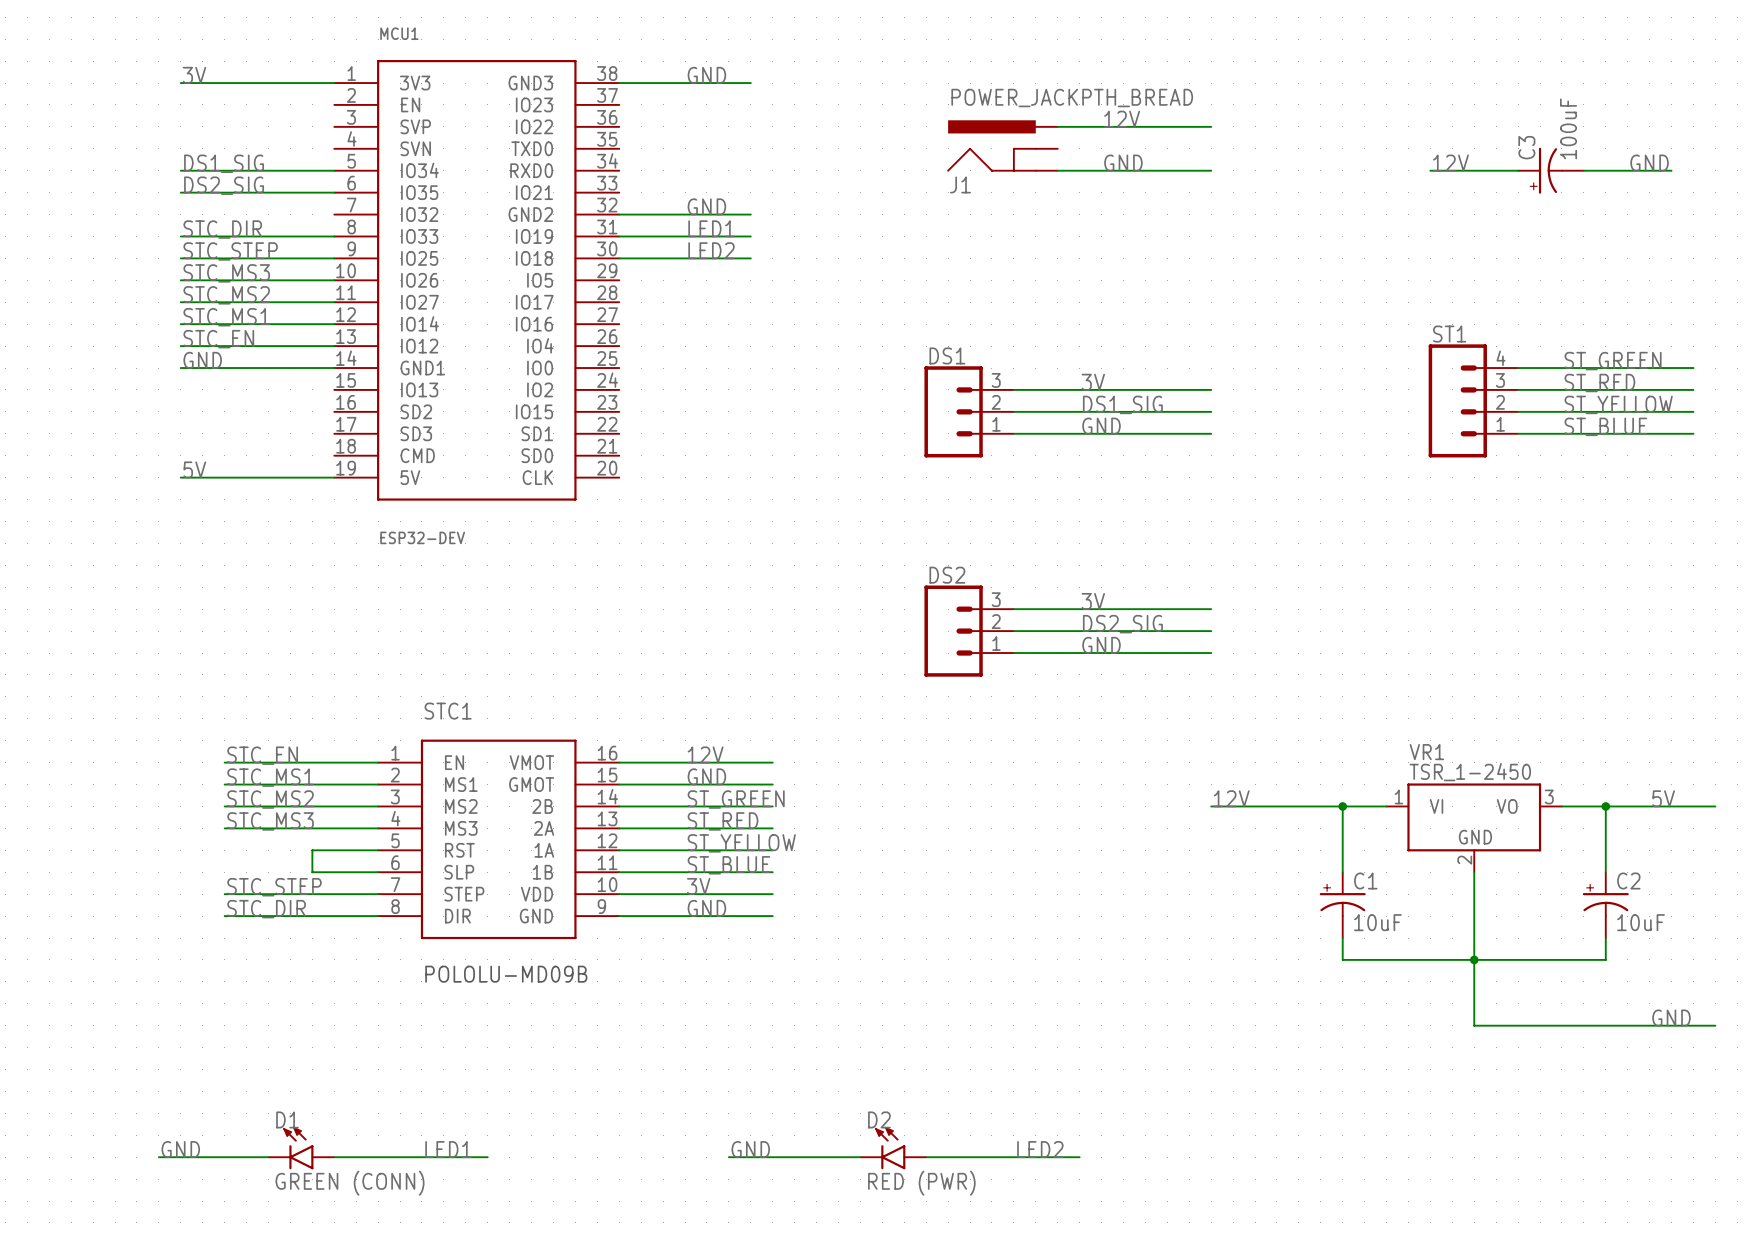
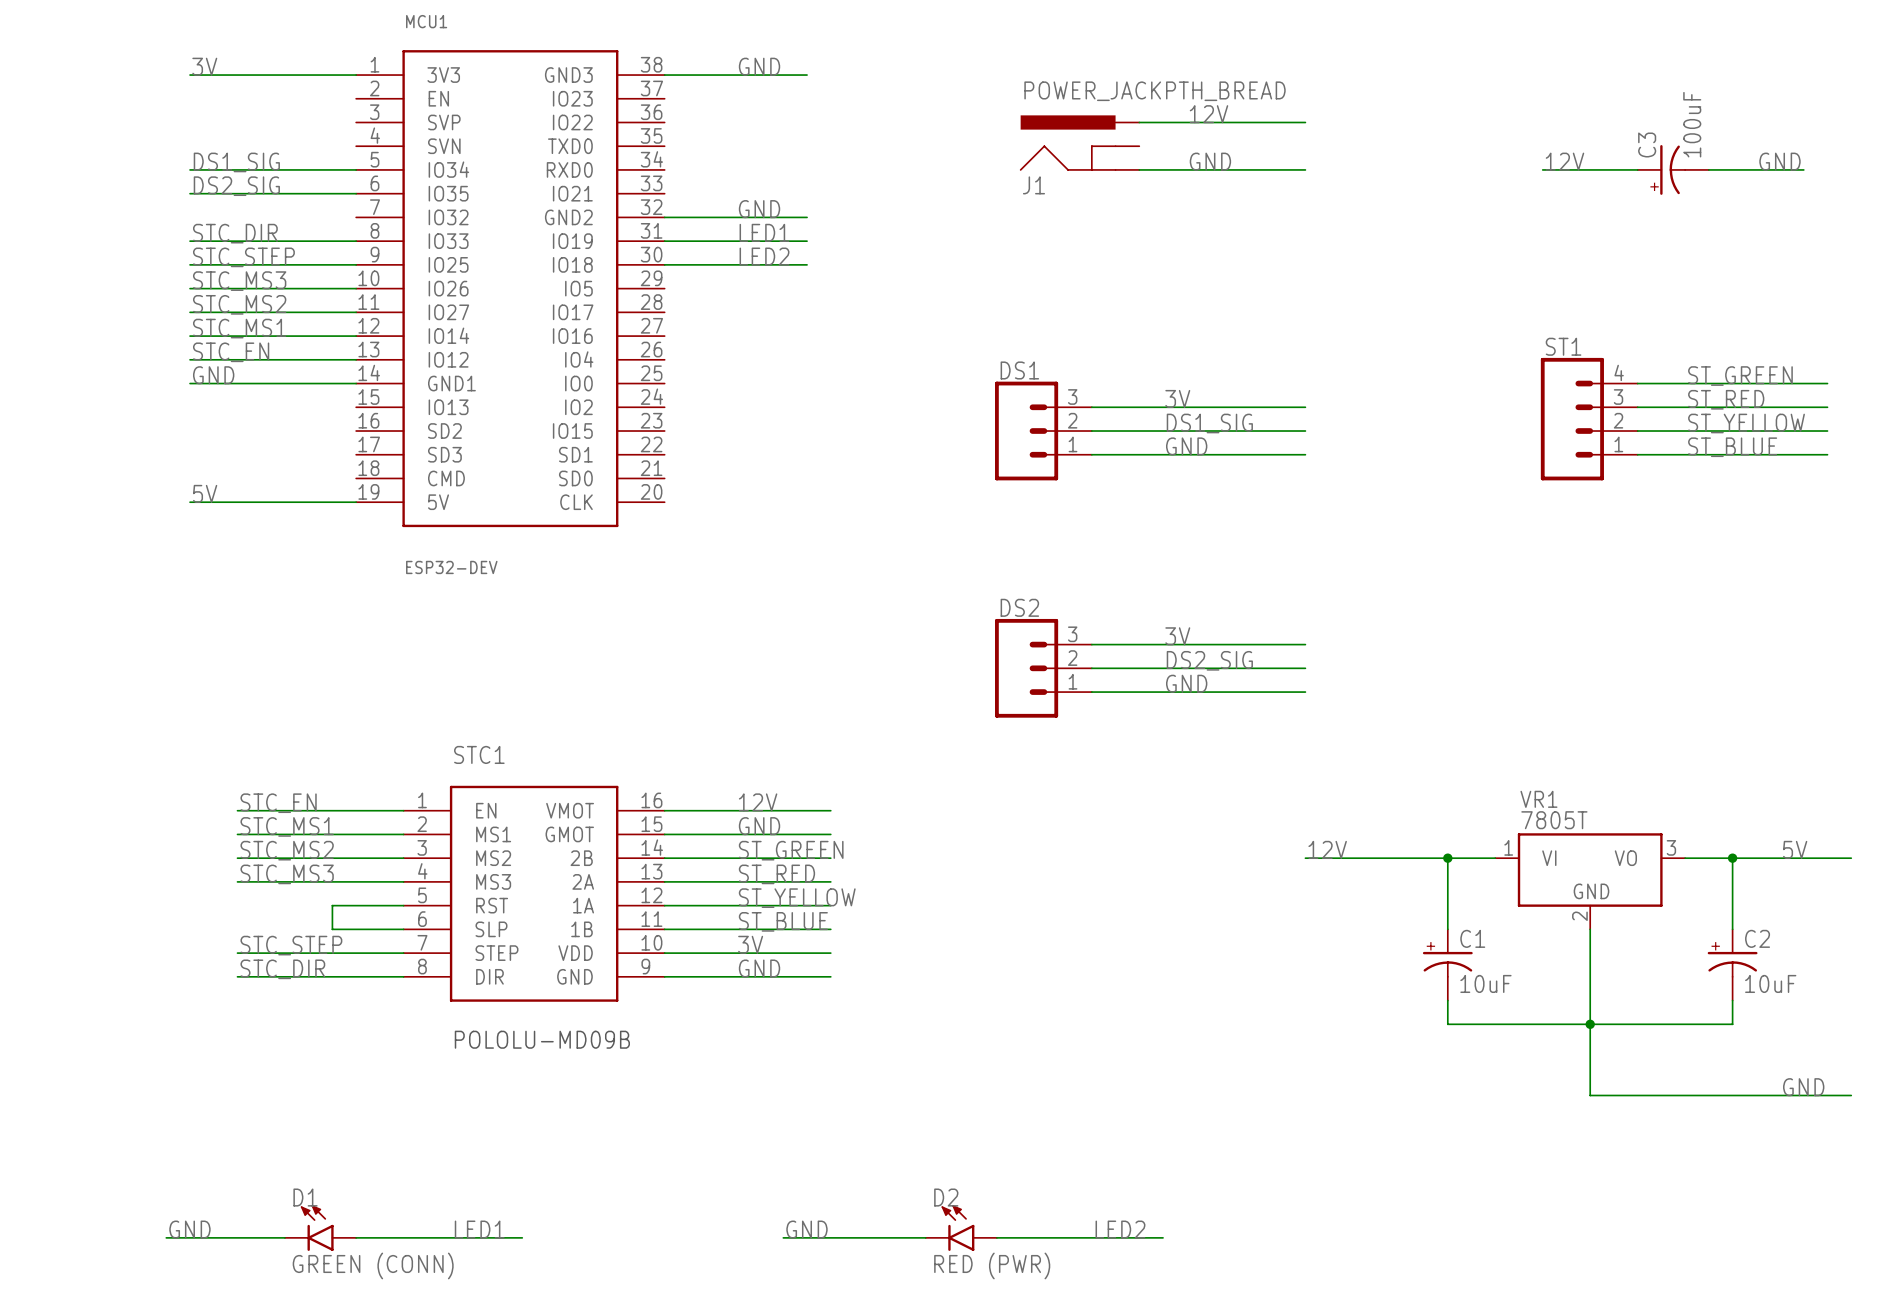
VR1 value: TSR_1-2450 (1470, 772) -> 7805T (1554, 820)

